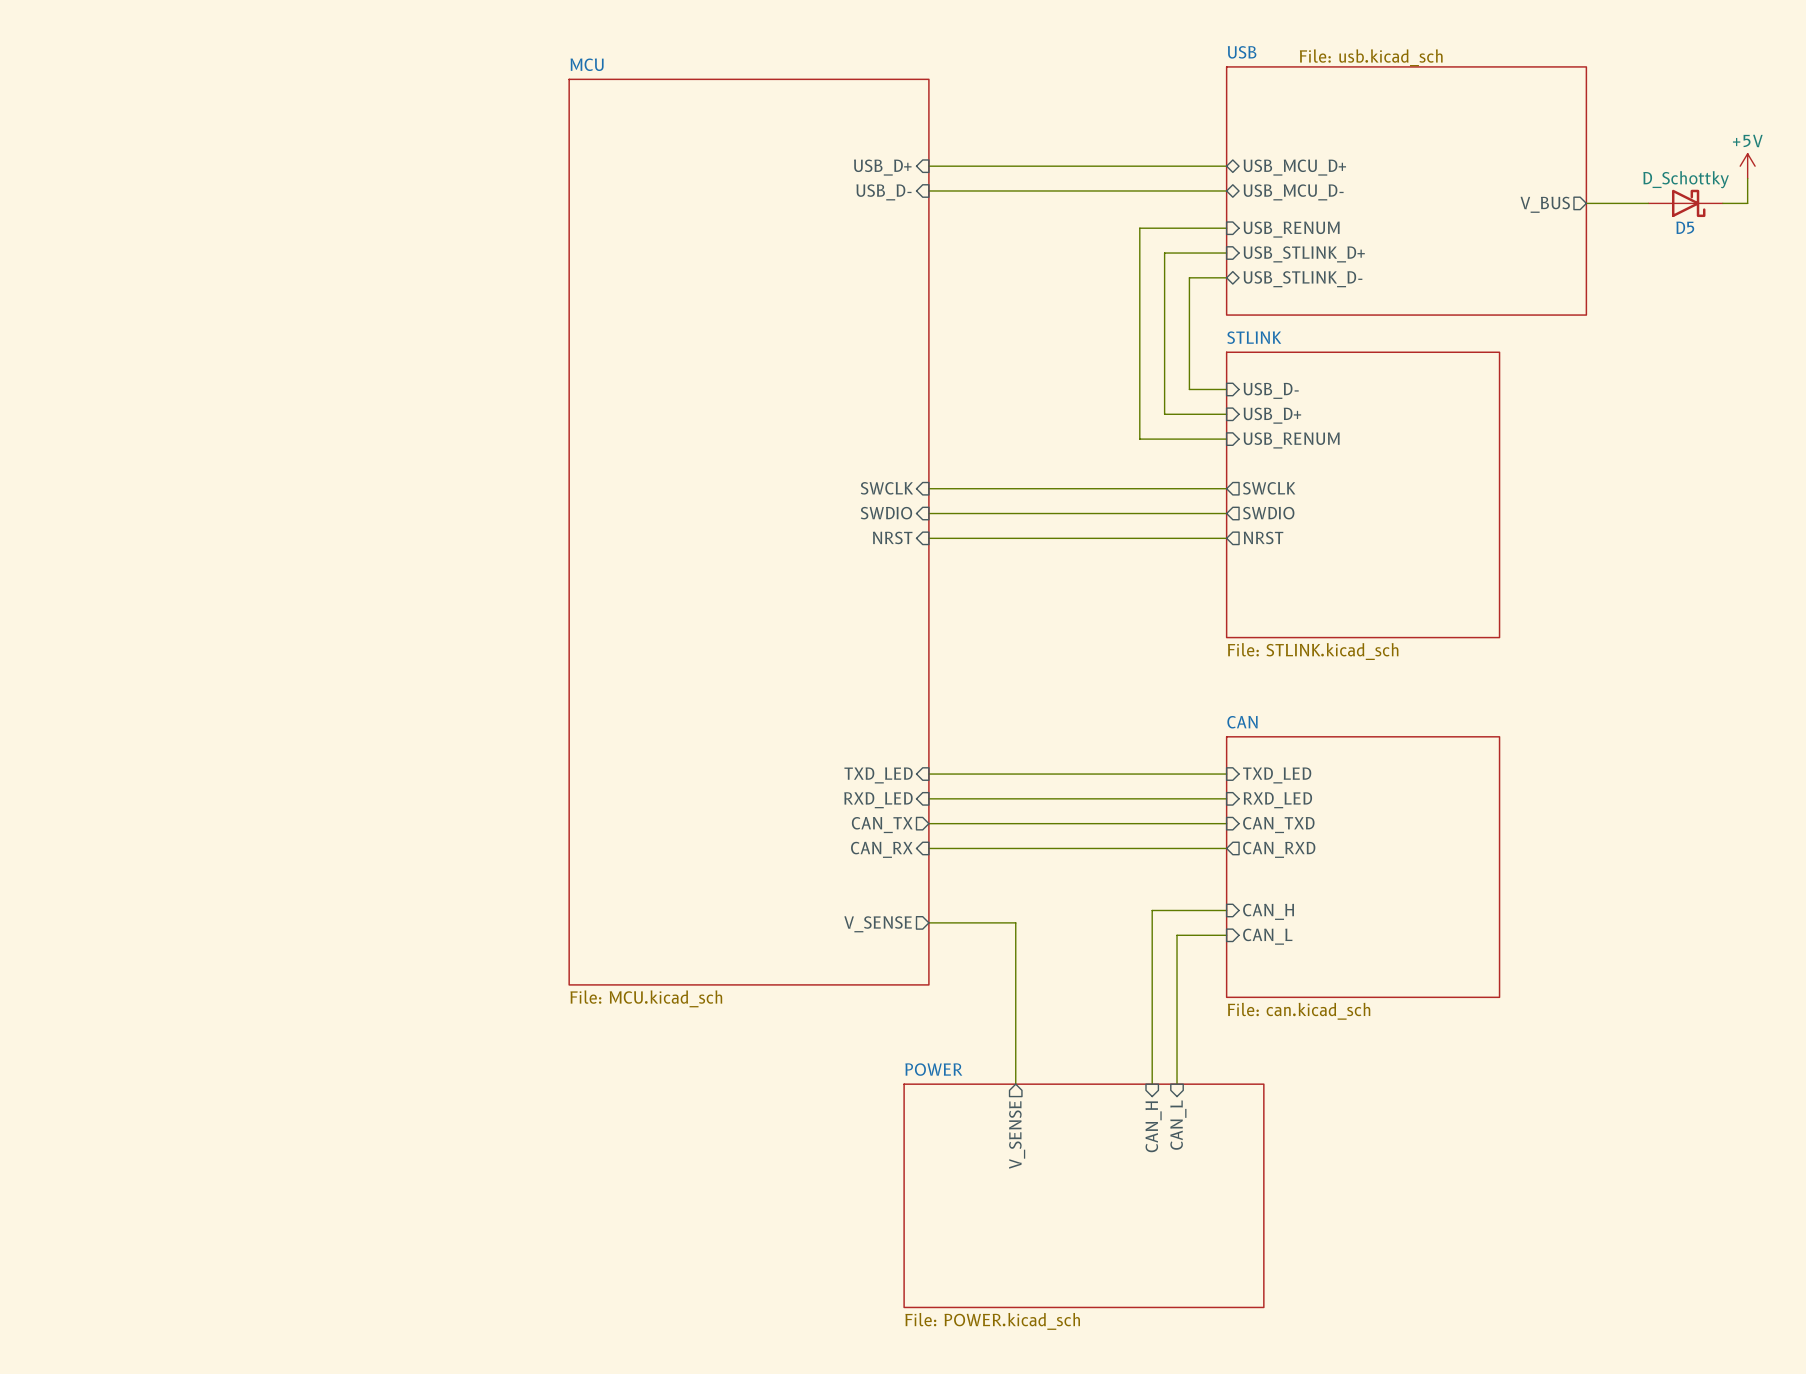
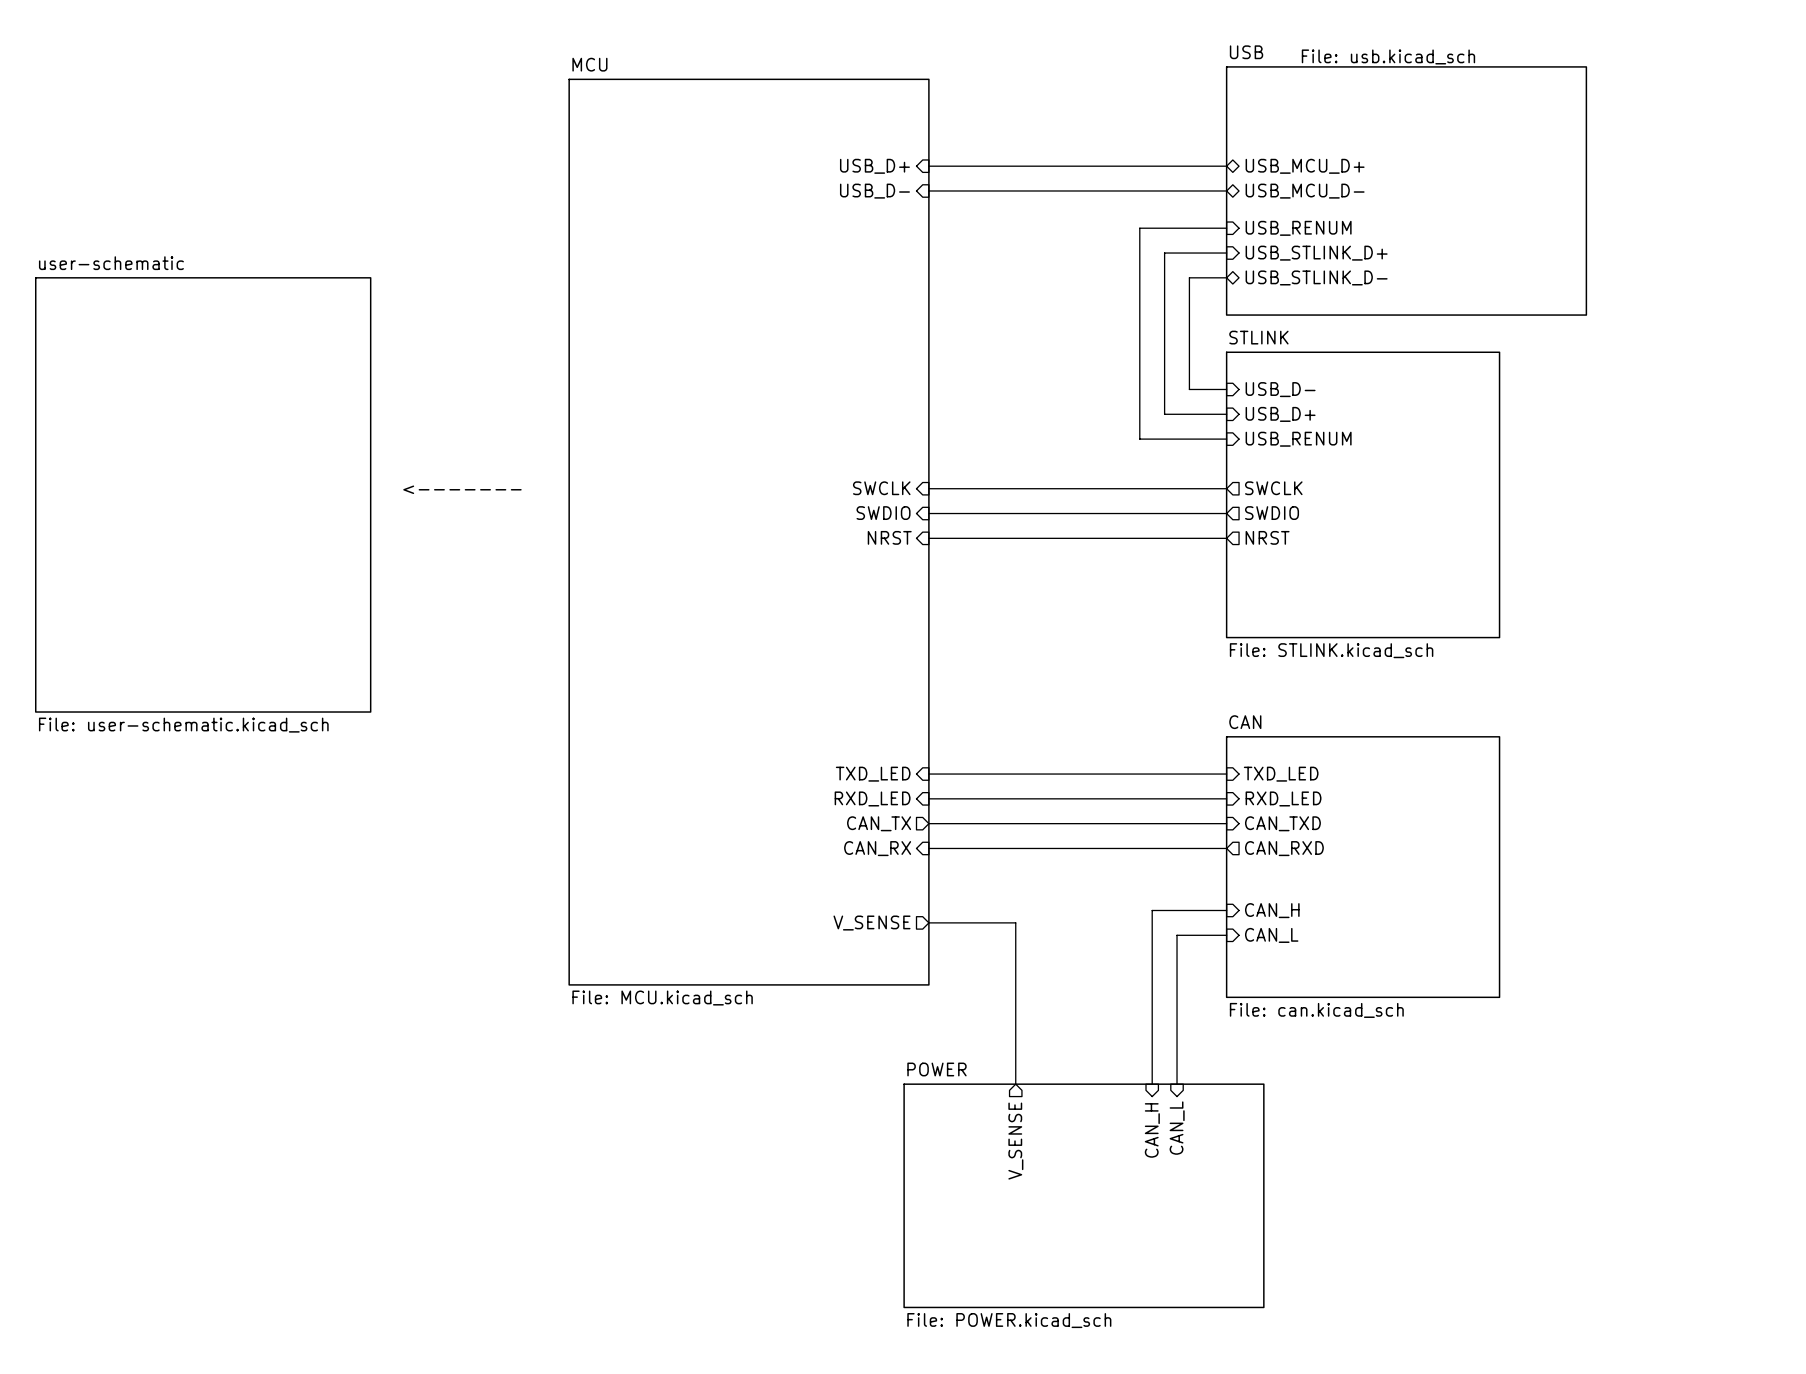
power symbol: +5V (1747, 166) -> none
wire: (1747, 178) (1747, 203) (1722, 203) -> none
wire: (1586, 203) (1648, 203) -> none
D5: D_Schottky (1685, 203) -> none
sheet pin: V_BUS (1545, 204) -> none
text: none -> <------- (462, 489)
sheet user-schematic: none -> File: user-schematic.kicad_sch (203, 494)

